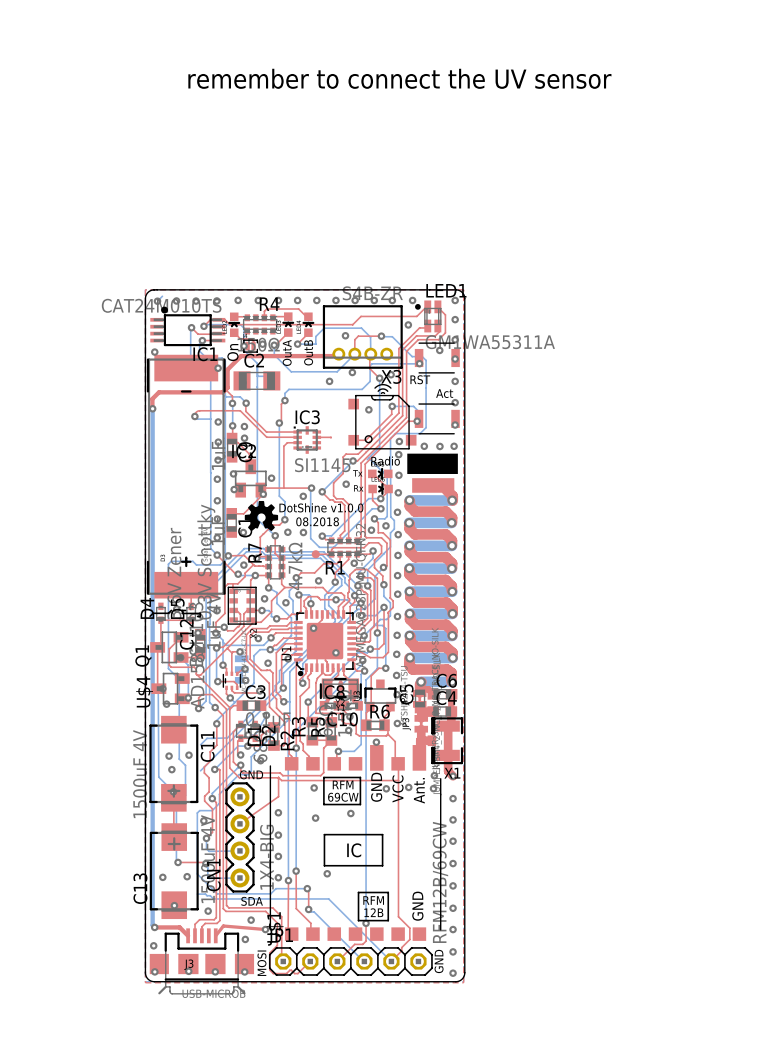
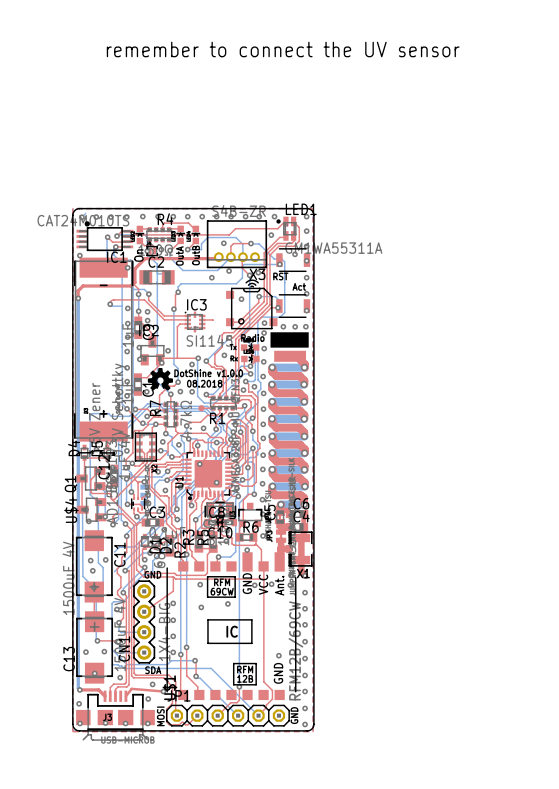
via: (327, 873) -> none
via: none -> (278, 655)

